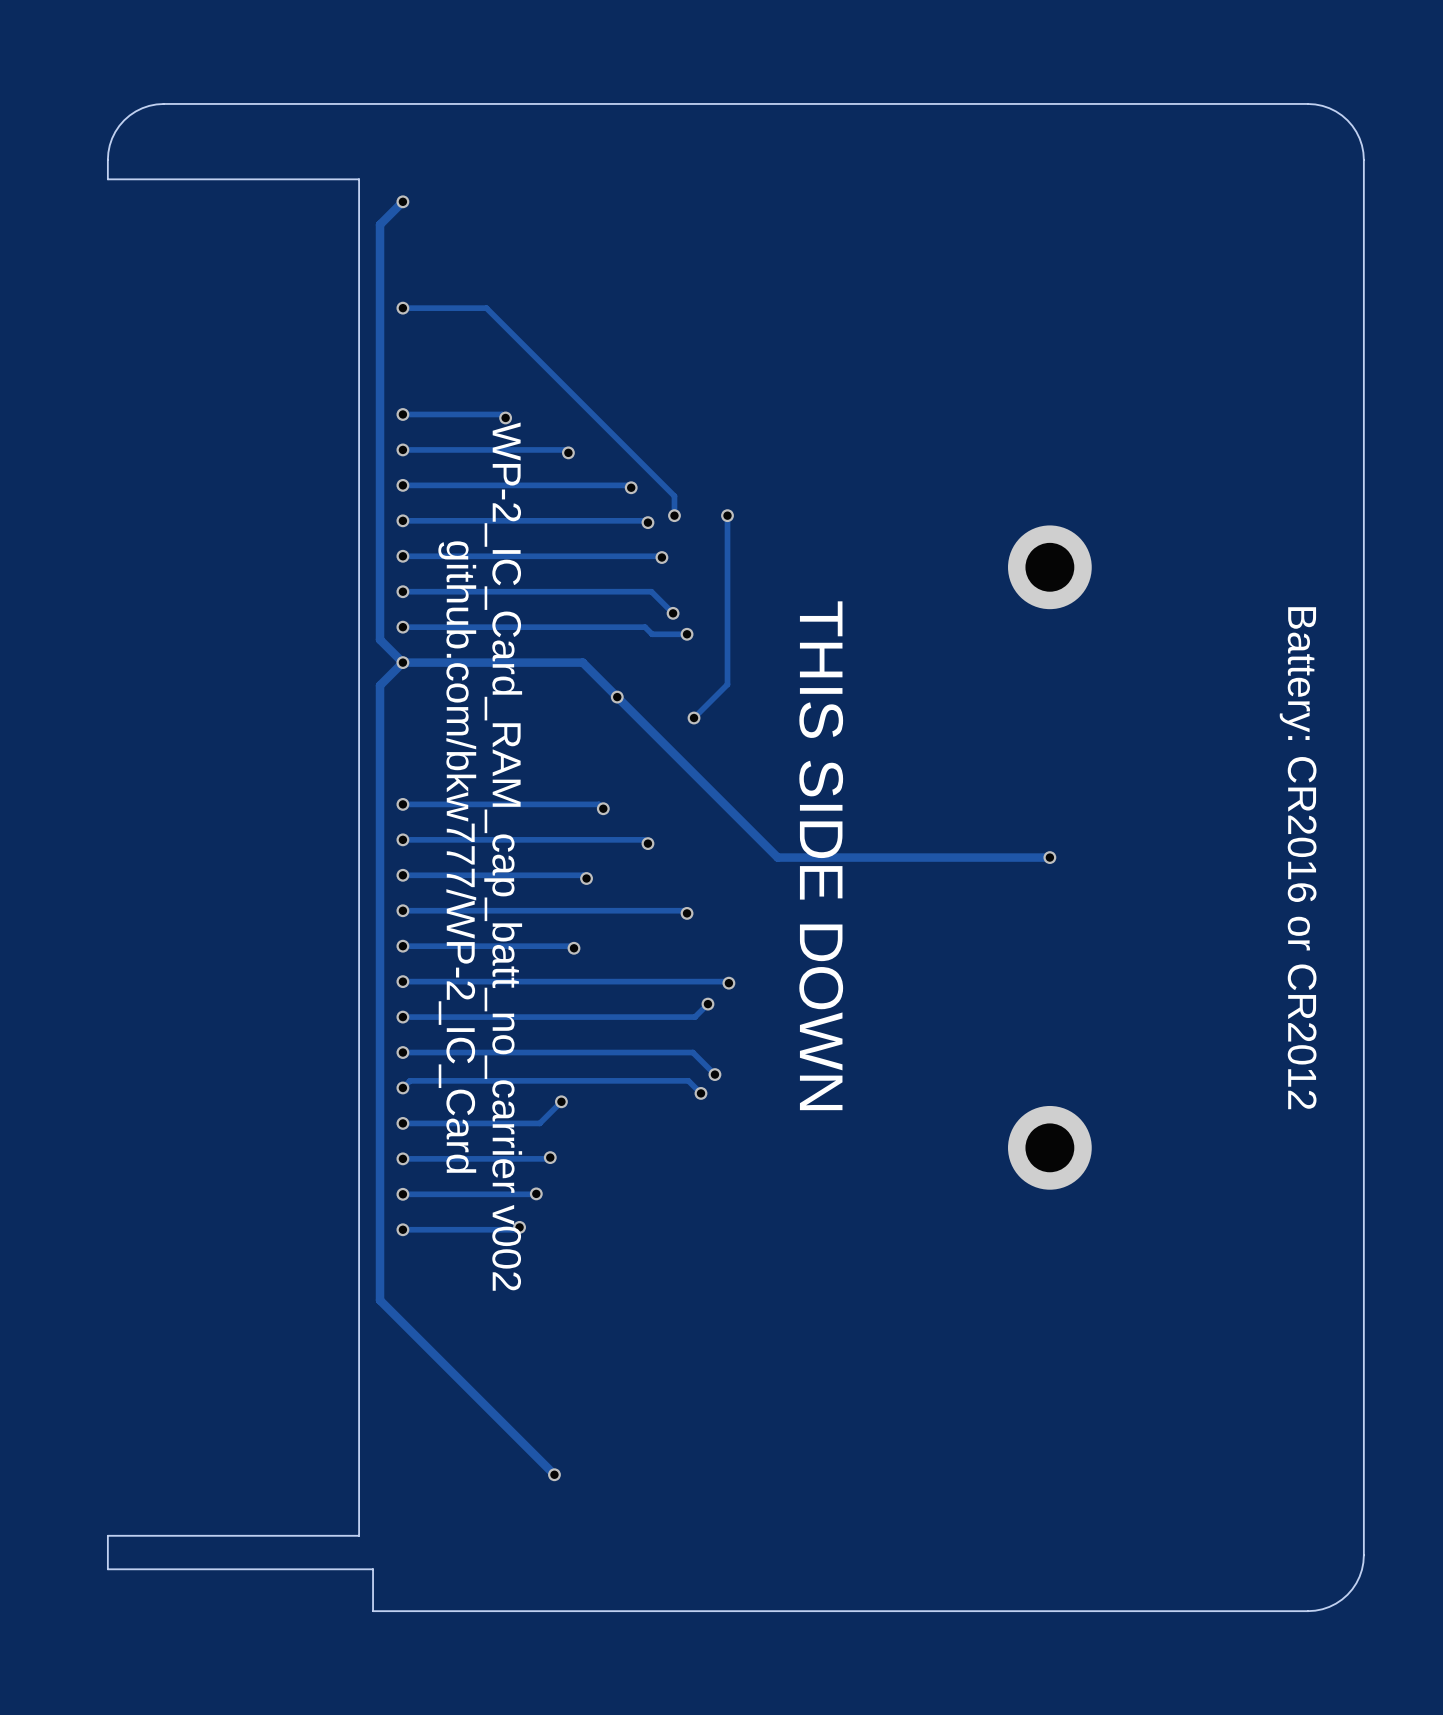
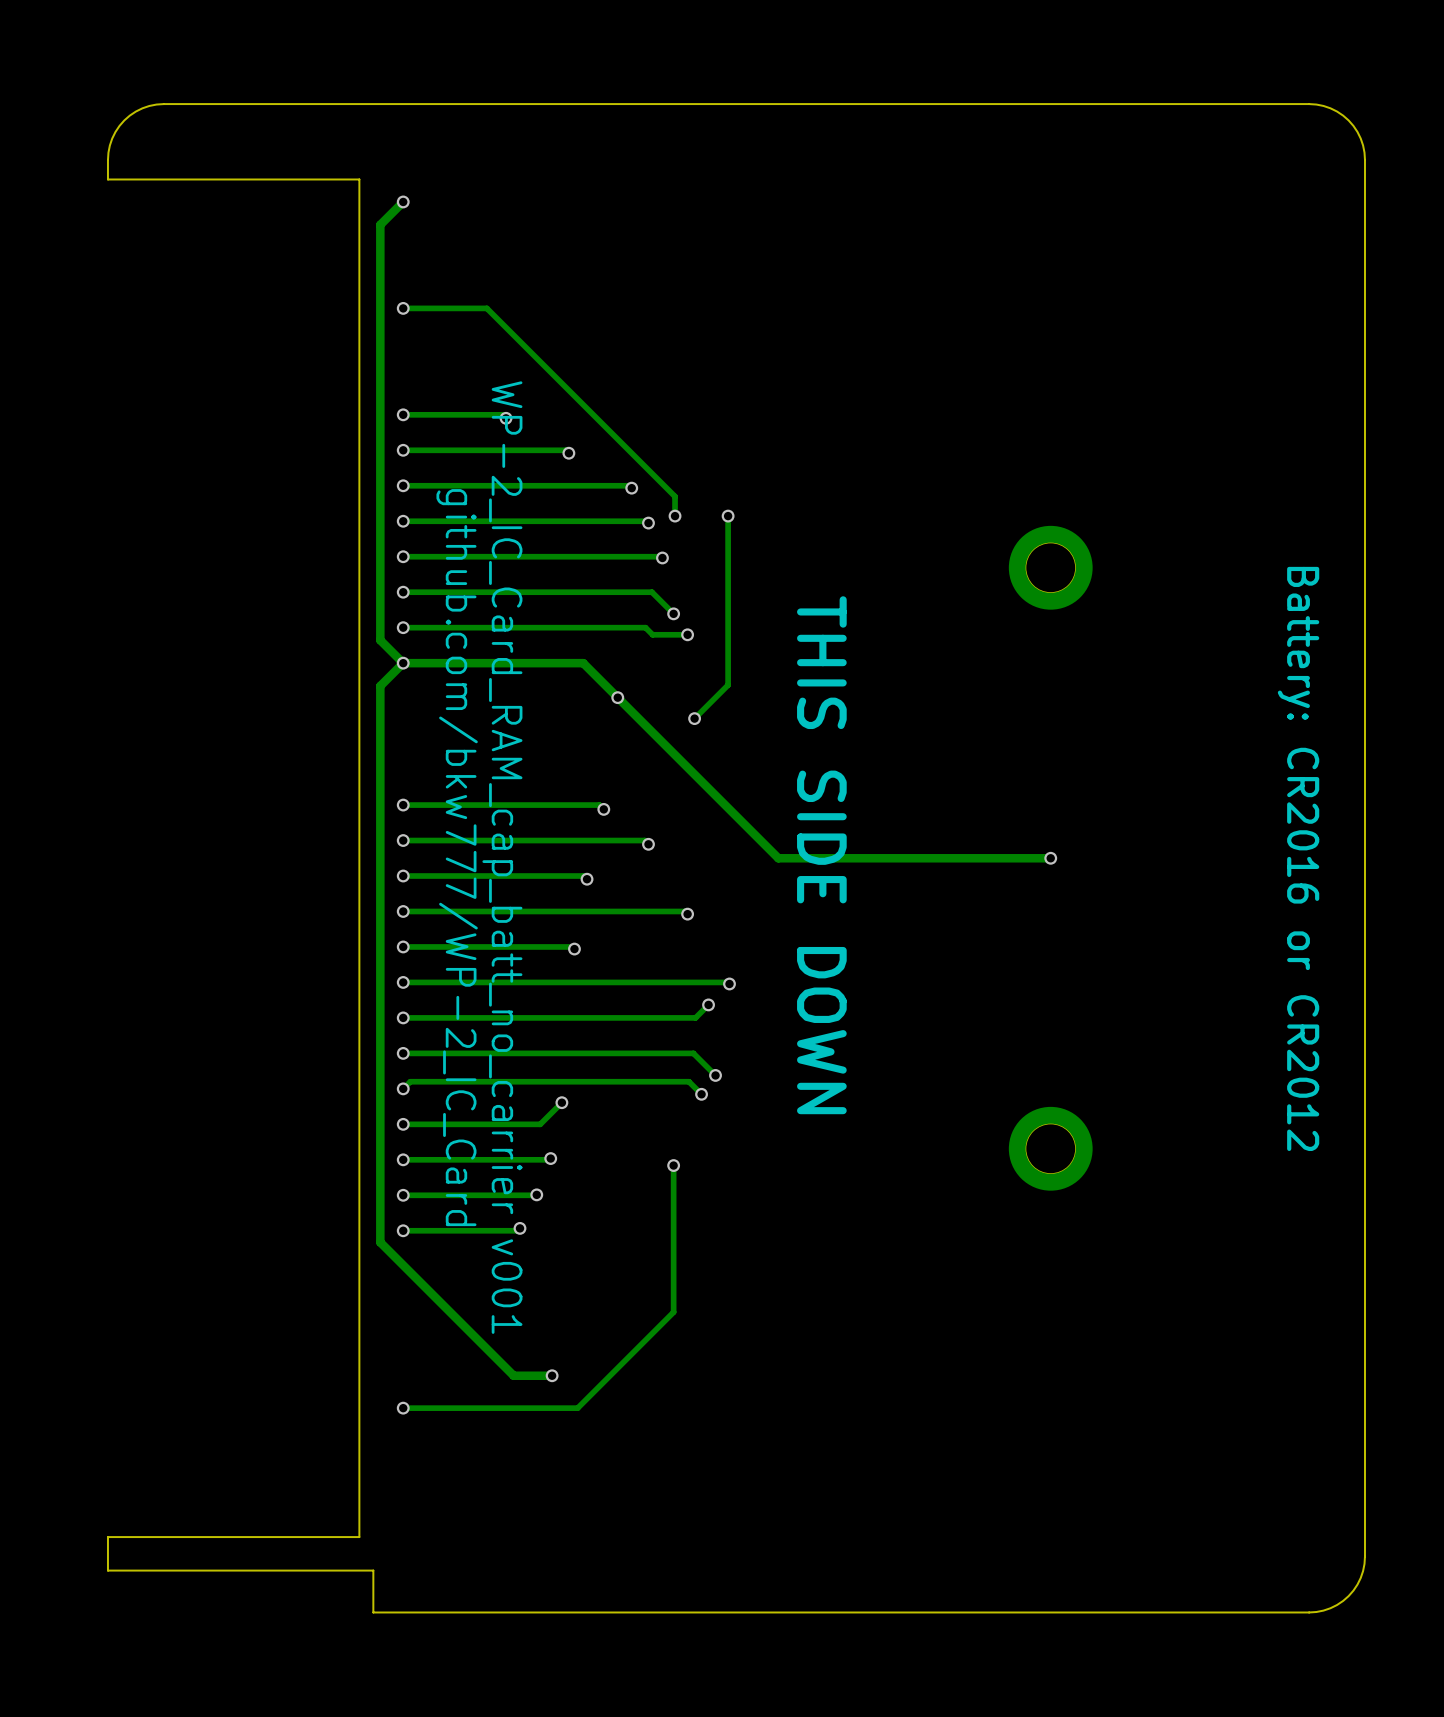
text: WP-2_IC_Card_RAM_cap_batt_no_carrier v002 (503, 856) -> WP-2_IC_Card_RAM_cap_batt_no_carrier v001 (502, 857)
track: none -> (673, 1165) (673, 1312) (577, 1408) (403, 1408)
via: none -> (673, 1165)
track: (380, 1241) (380, 1300) (554, 1474) -> (380, 1242) (513, 1375) (552, 1375)
via: none -> (552, 1375)
via: none -> (403, 1408)
via: (554, 1474) -> none

